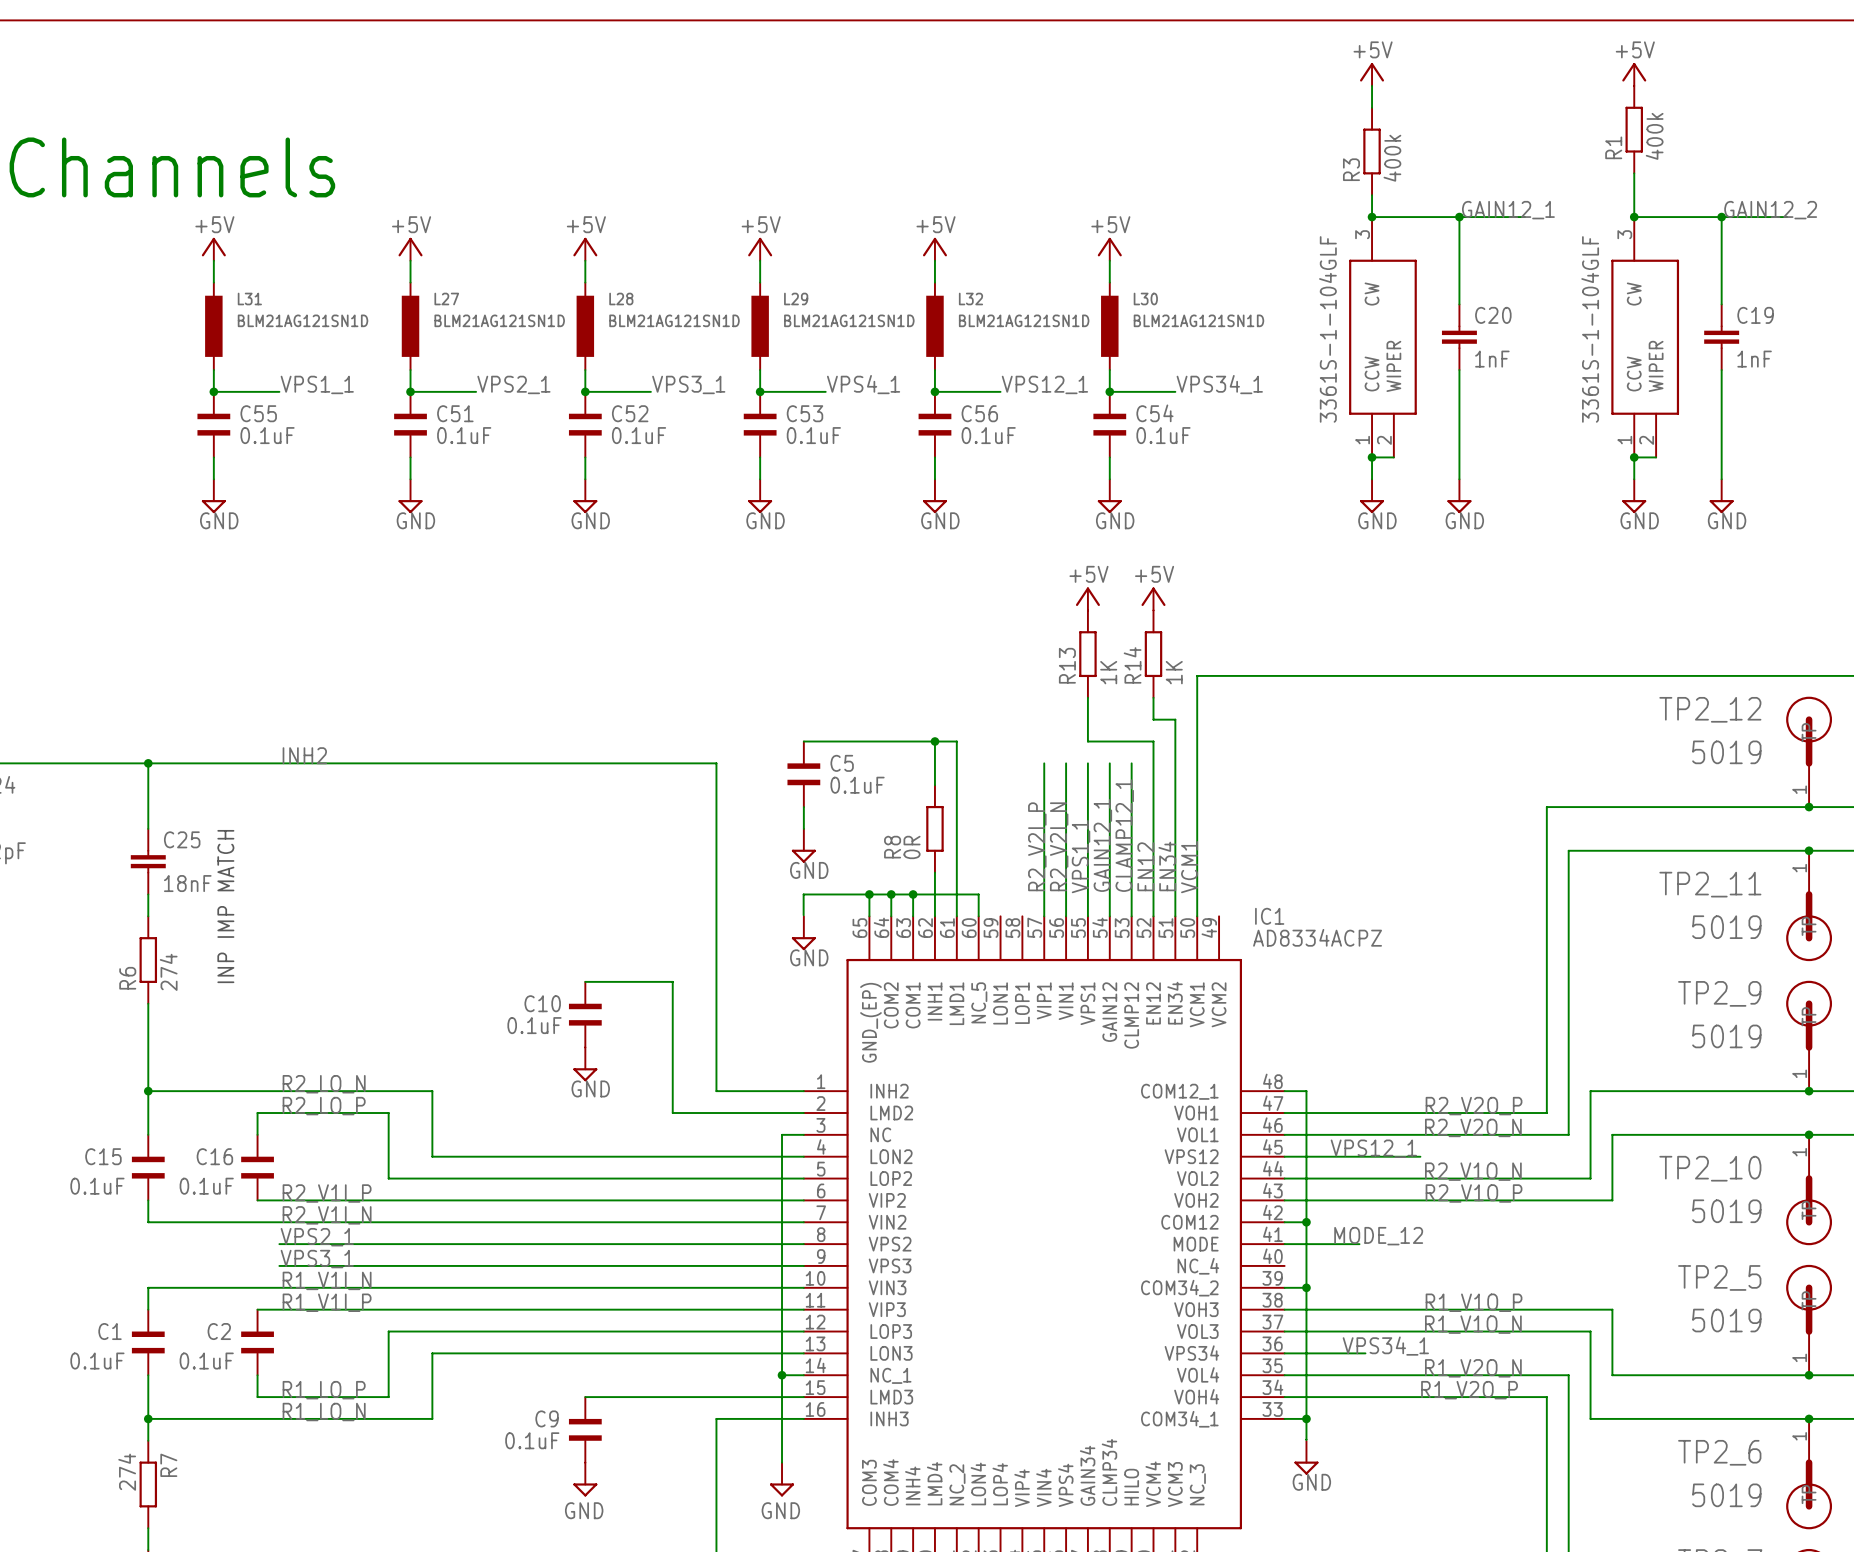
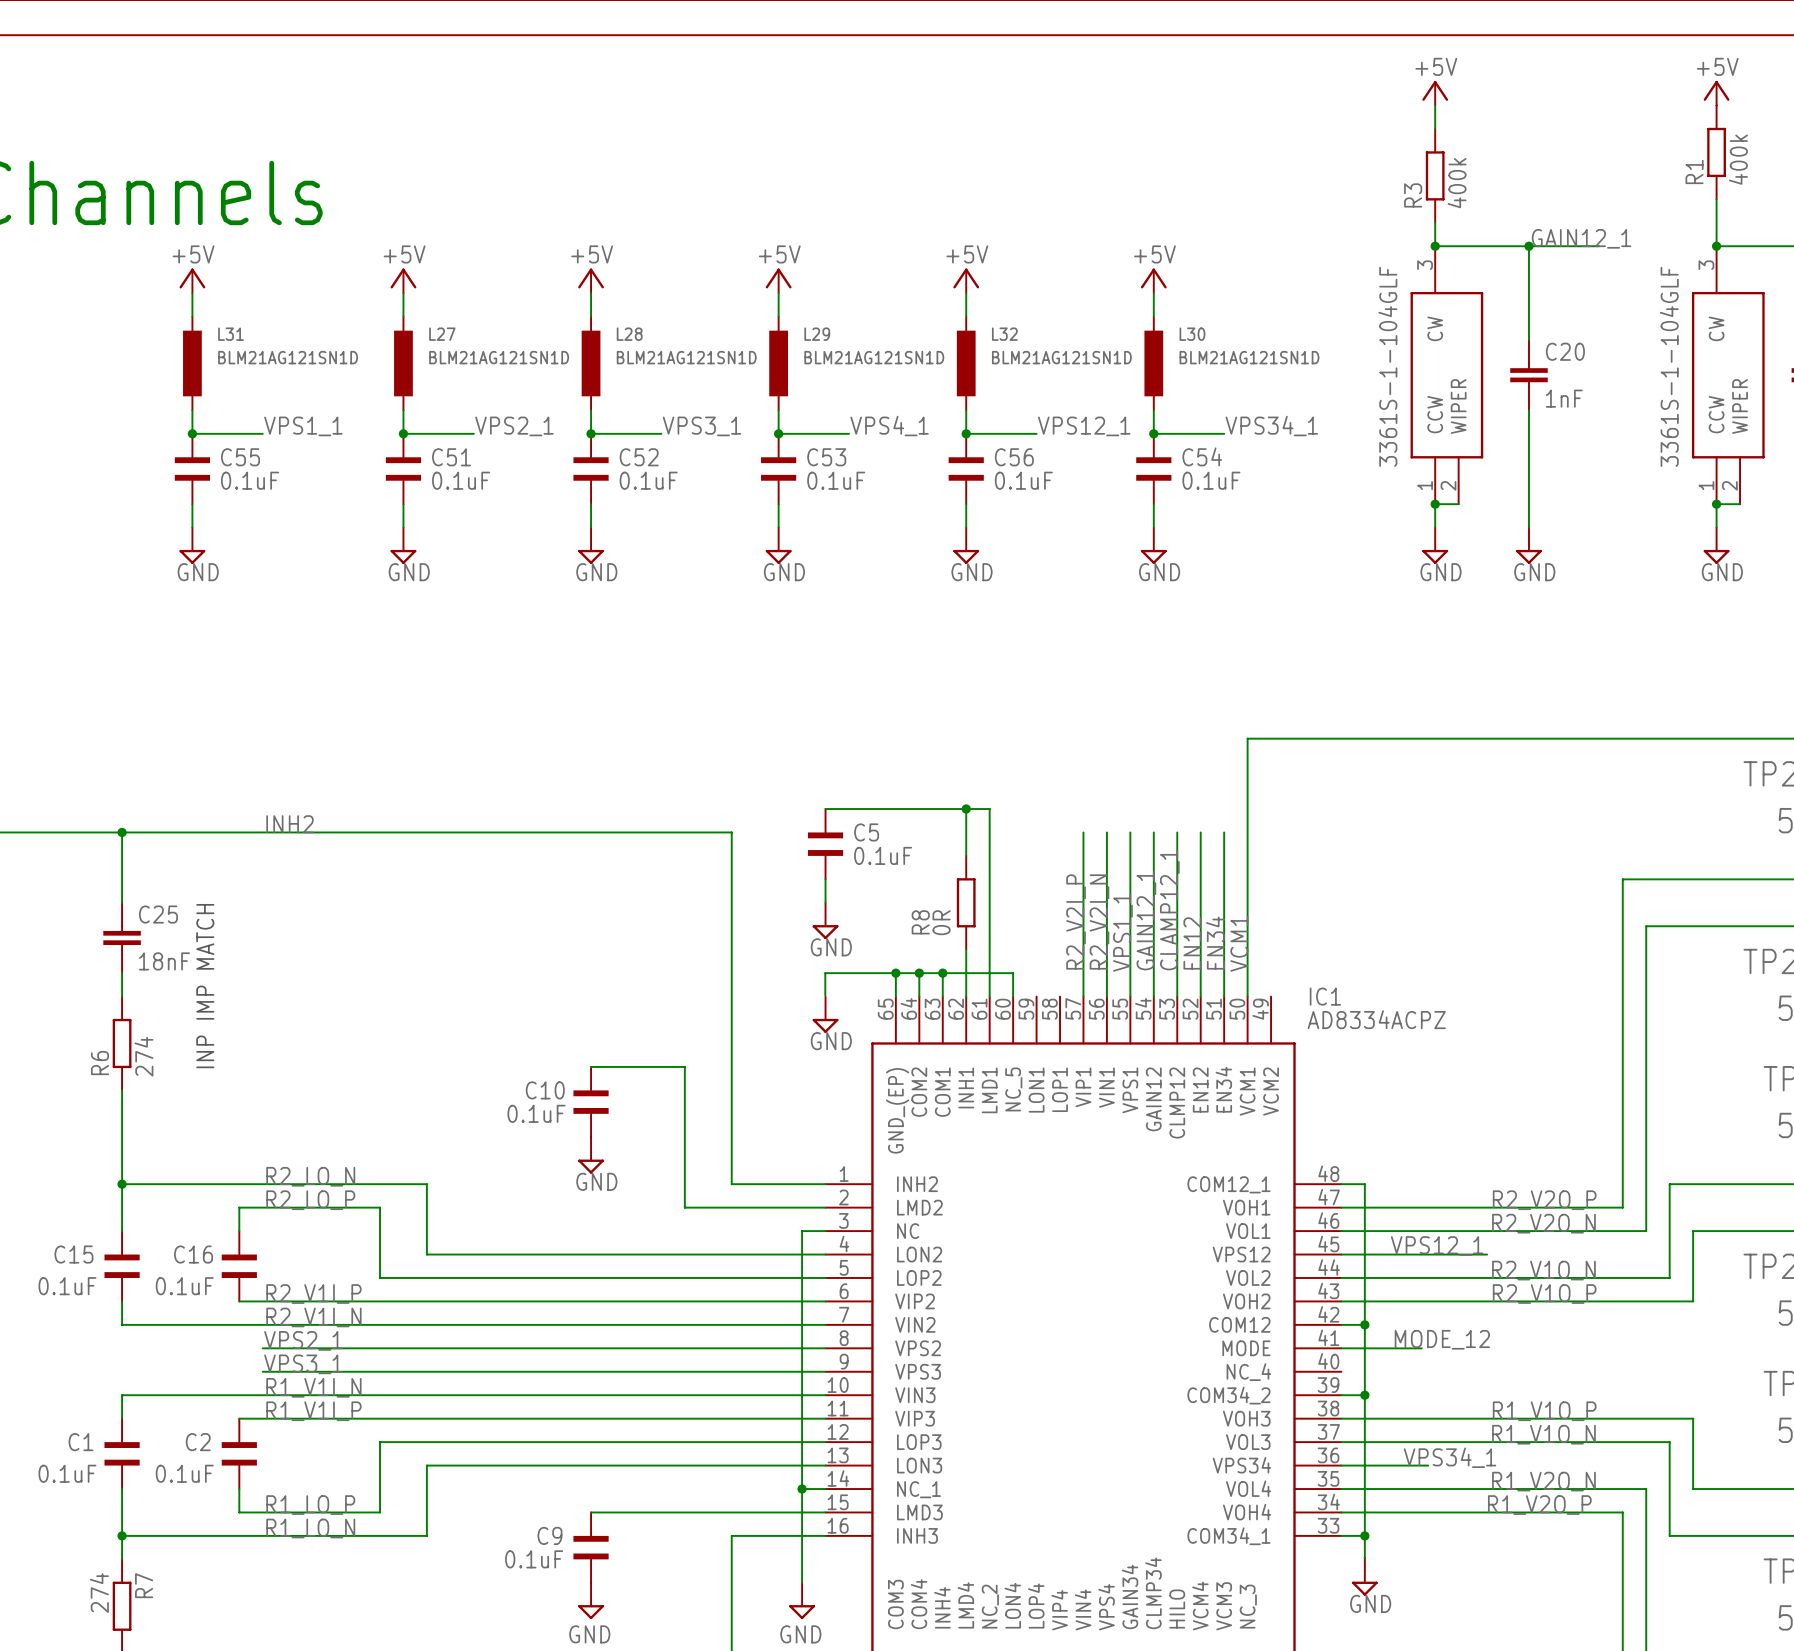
power symbol: +5V (1087, 598) -> none
power symbol: +5V (1153, 598) -> none
R13: 1K (1087, 654) -> none
R14: 1K (1153, 654) -> none
wire: (1087, 697) (1087, 741) (1153, 741) (1153, 763) -> none
wire: (1153, 697) (1153, 719) (1175, 719) (1175, 763) -> none

